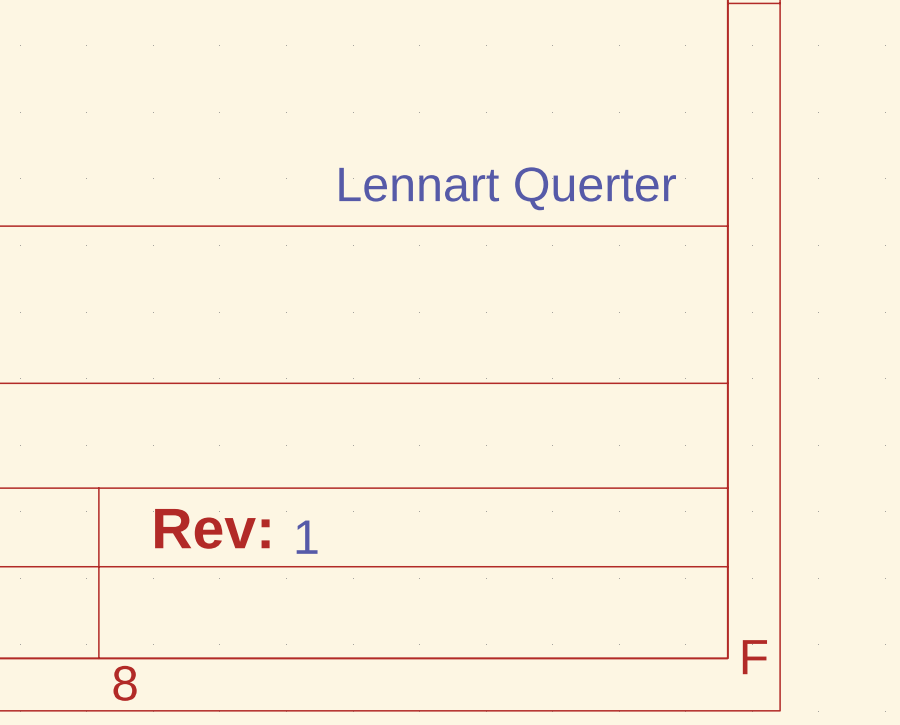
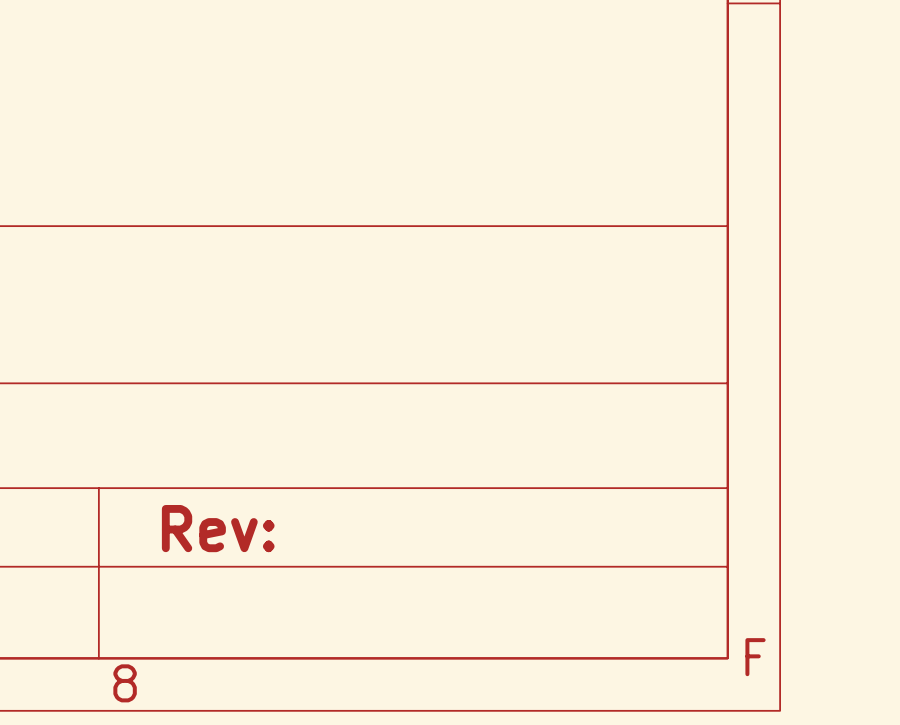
text: Lennart Querter (507, 188) -> none
text: 1 (307, 537) -> none

